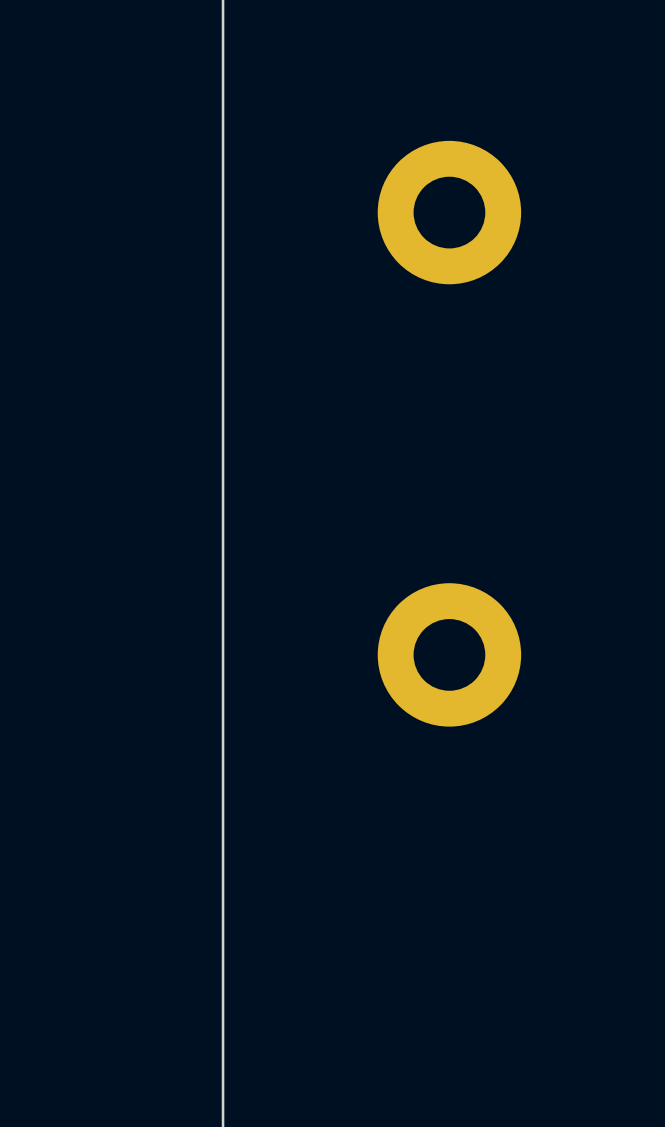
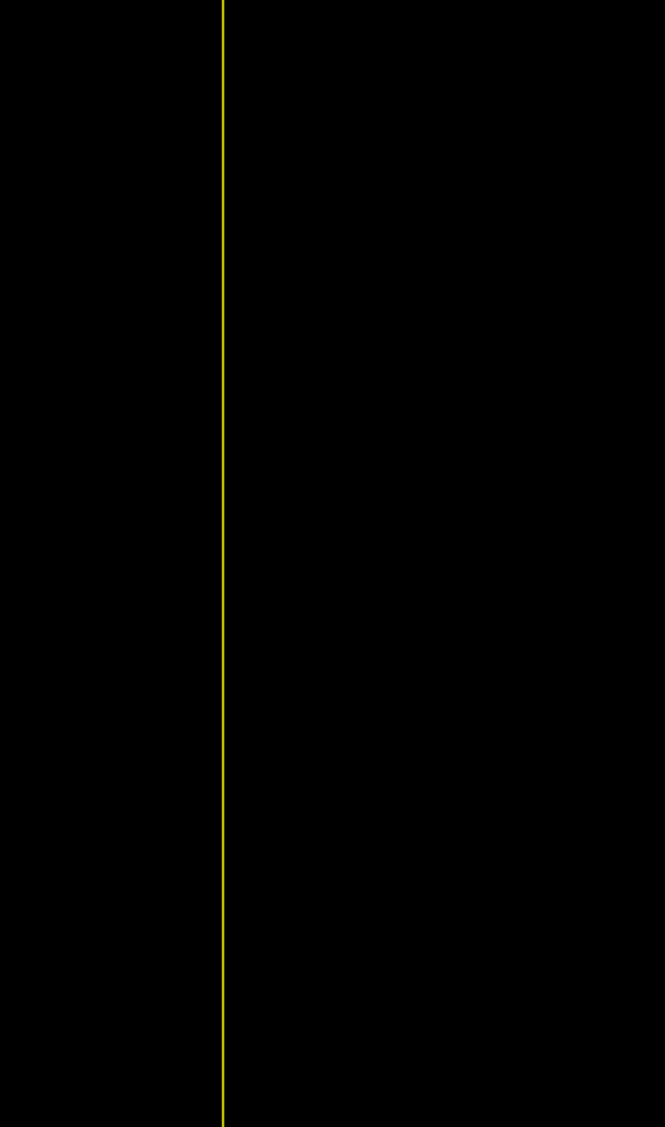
part: (449, 212) -> none
part: (449, 654) -> none

